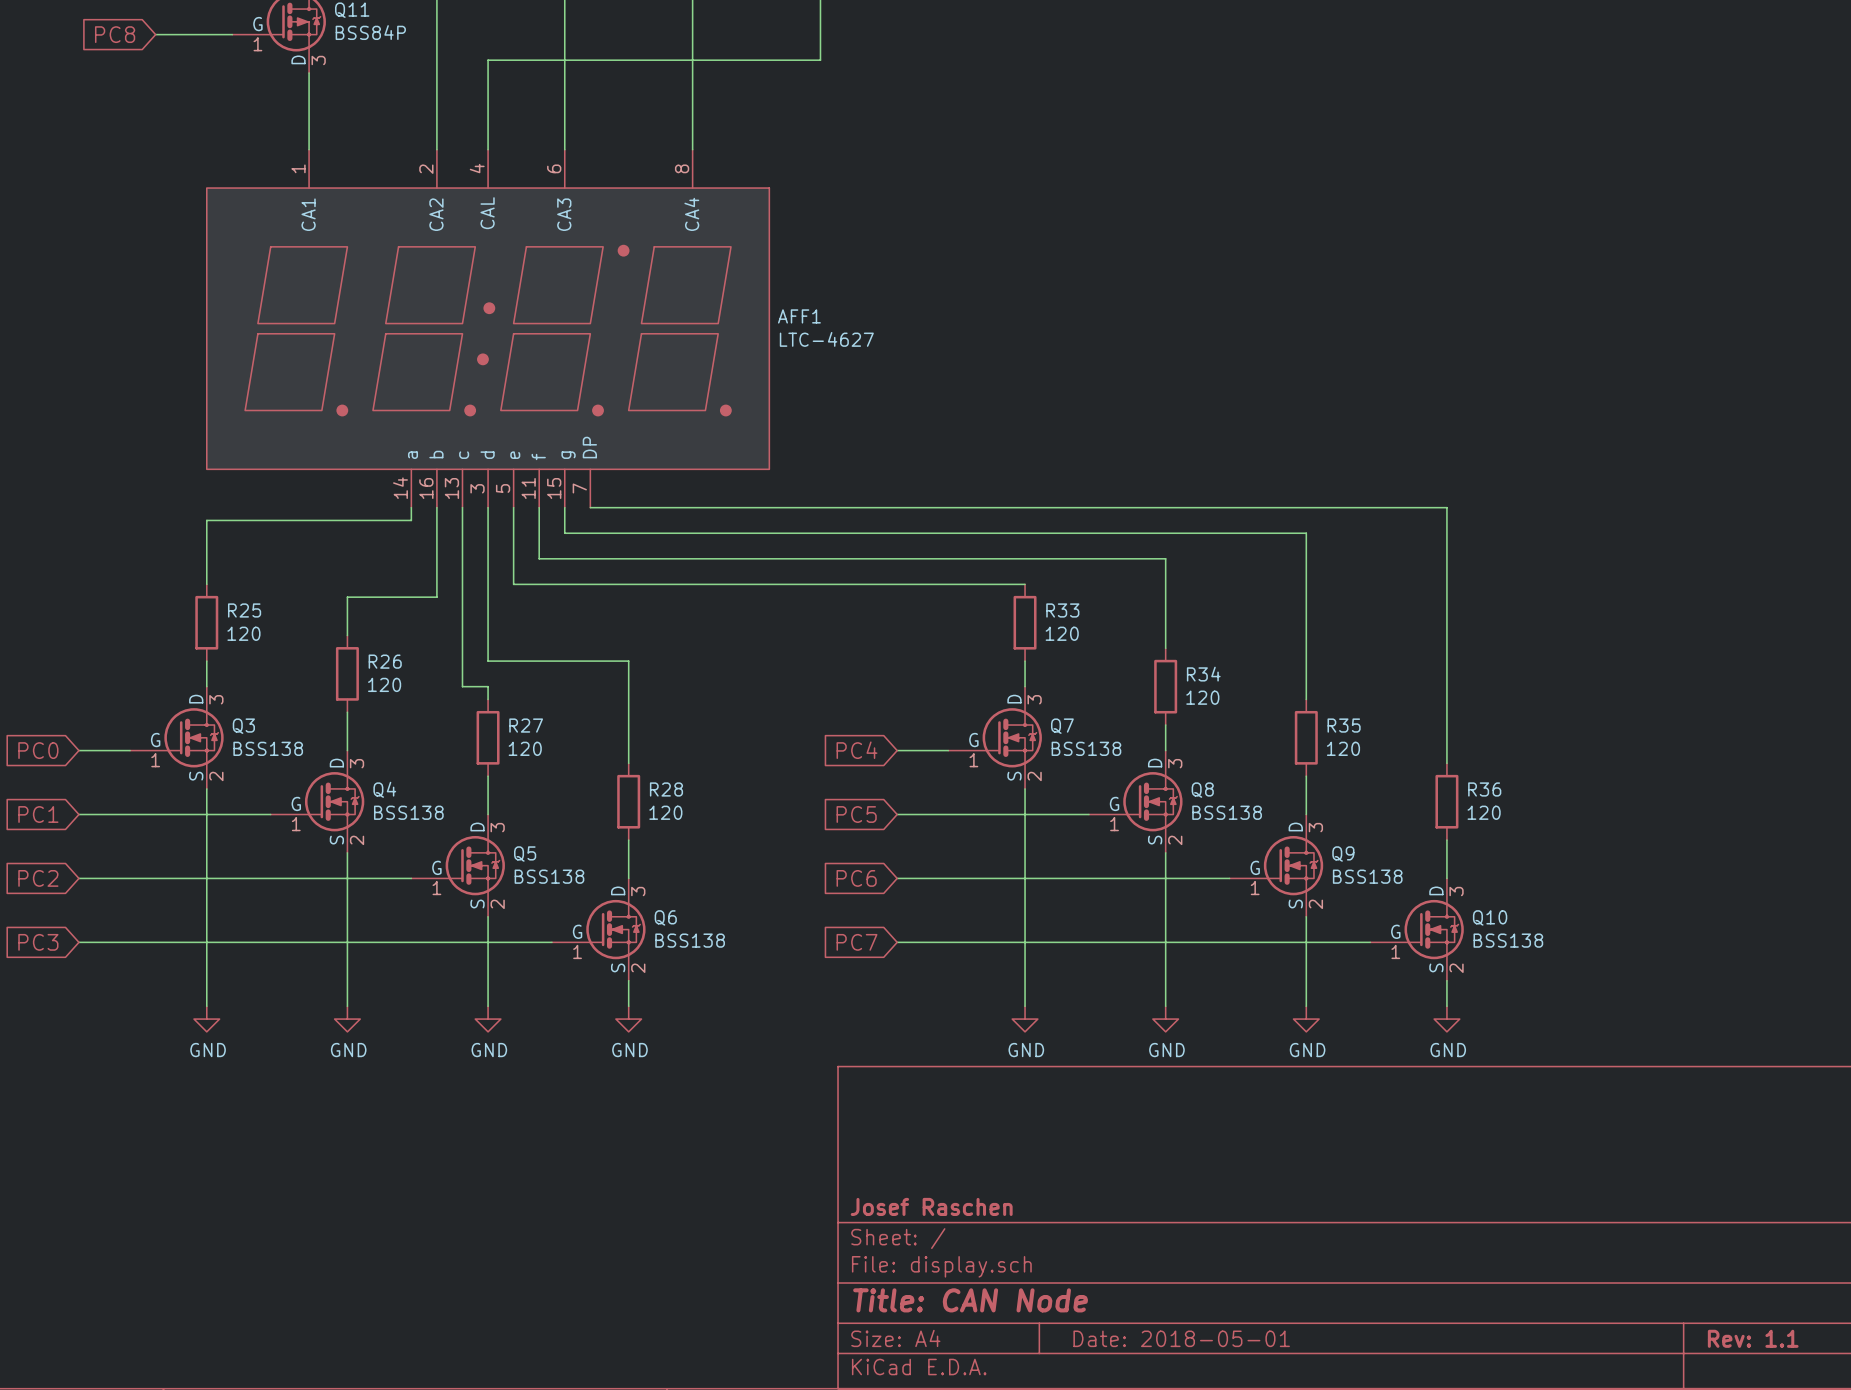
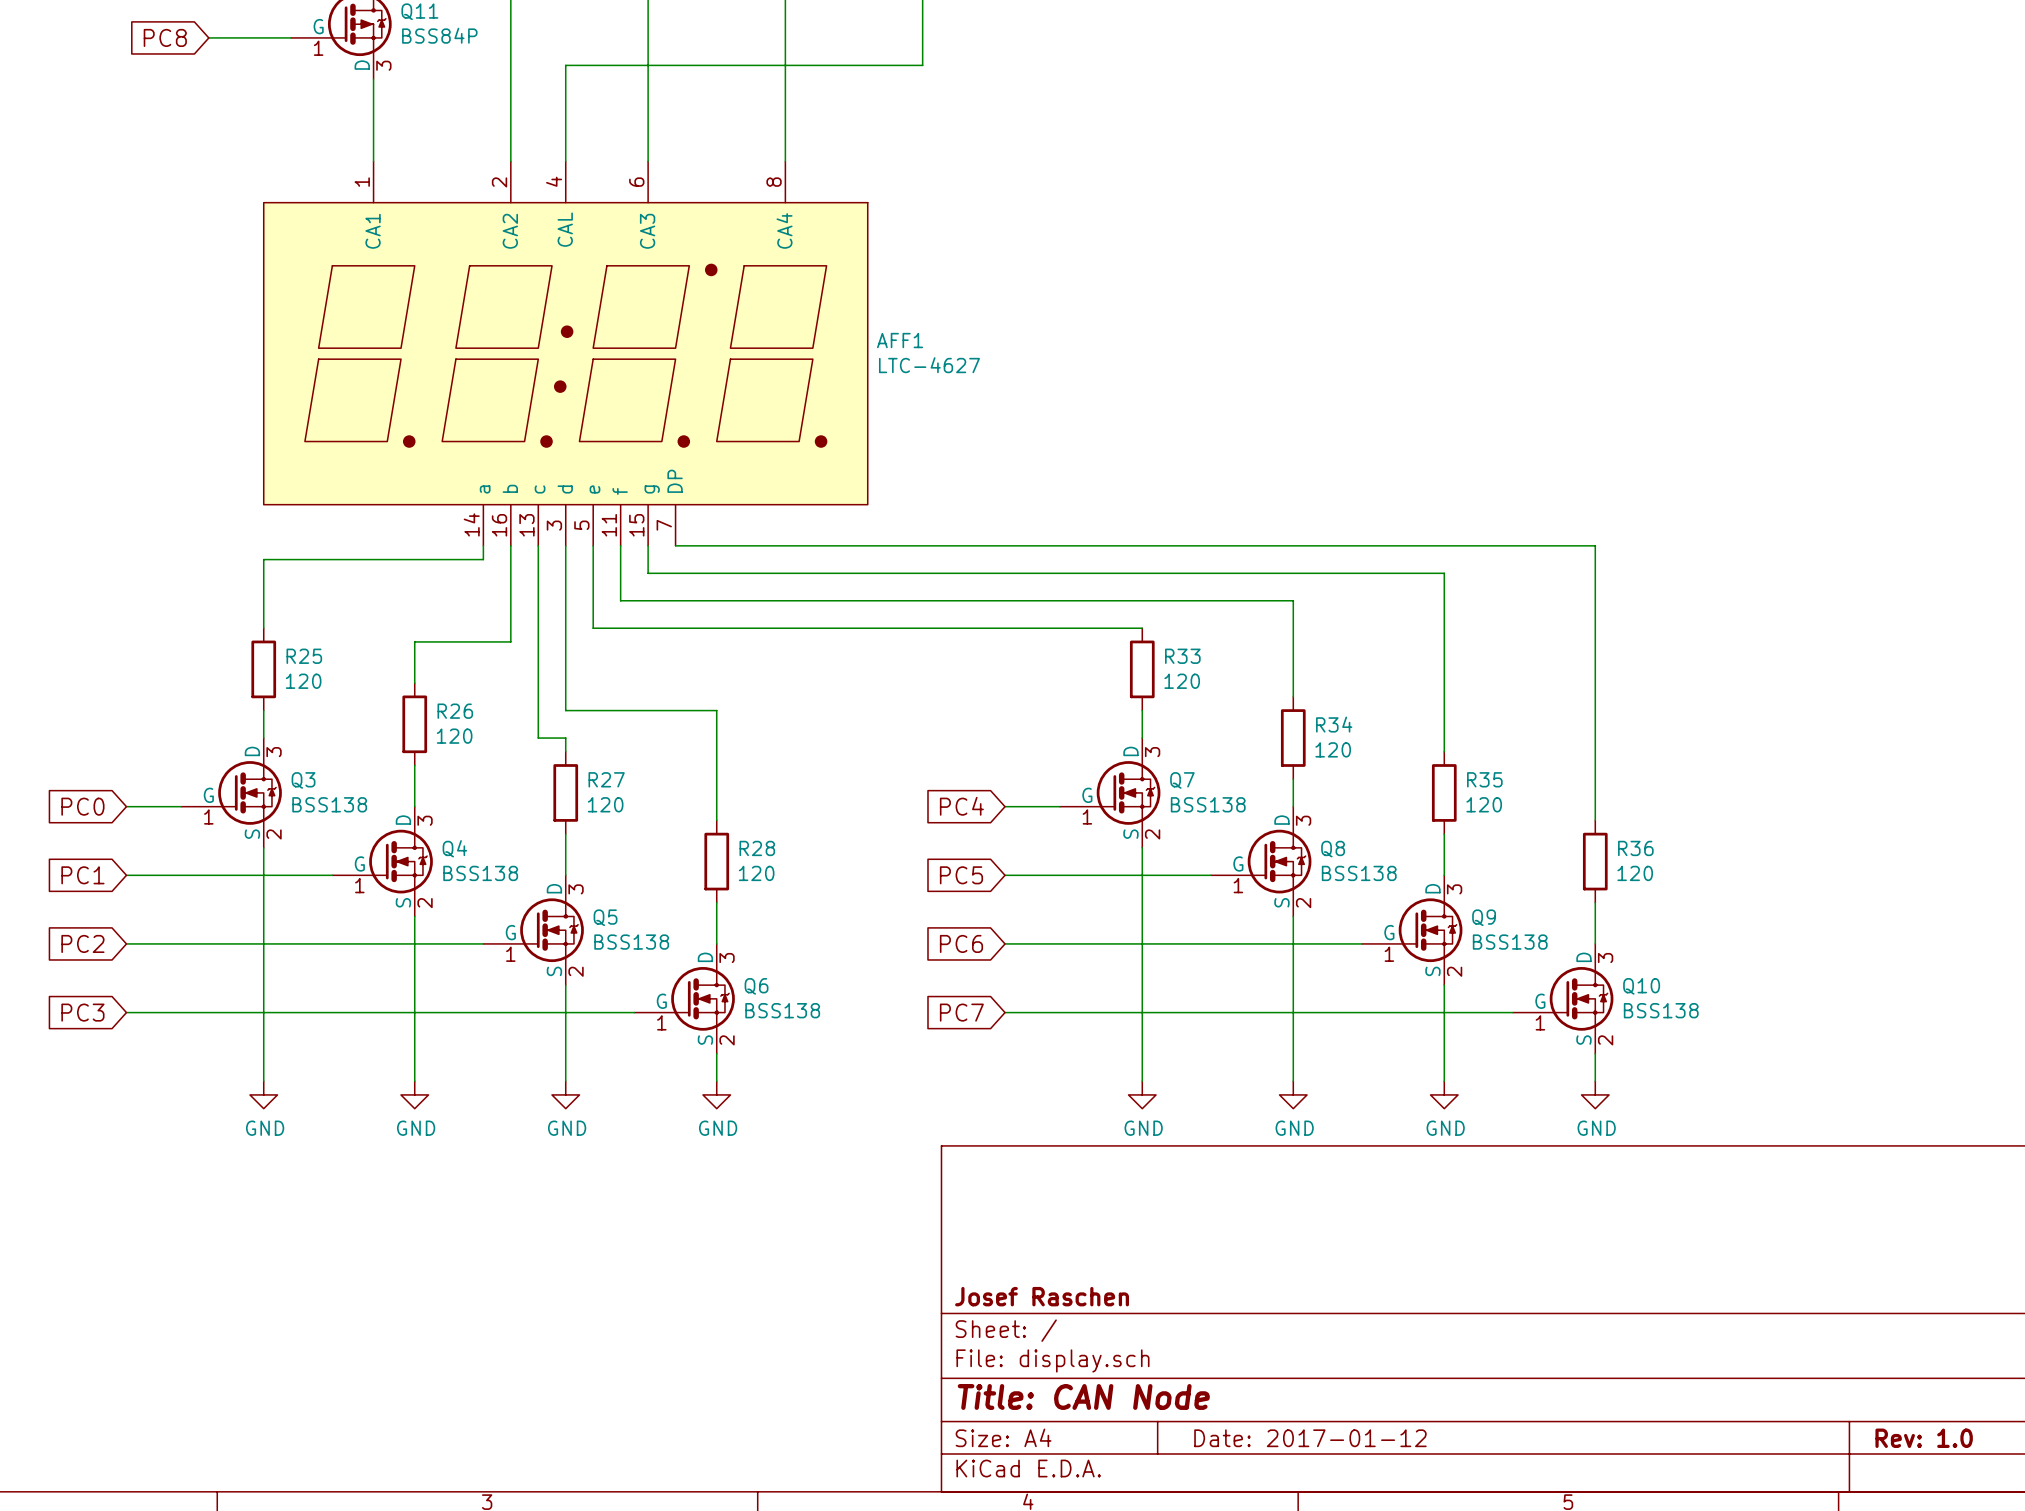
title block: Date: 2018-05-01 (1181, 1338) -> Date: 2017-01-12 (1310, 1438)
title block: Rev: 1.1 (1753, 1338) -> Rev: 1.0 (1924, 1438)

